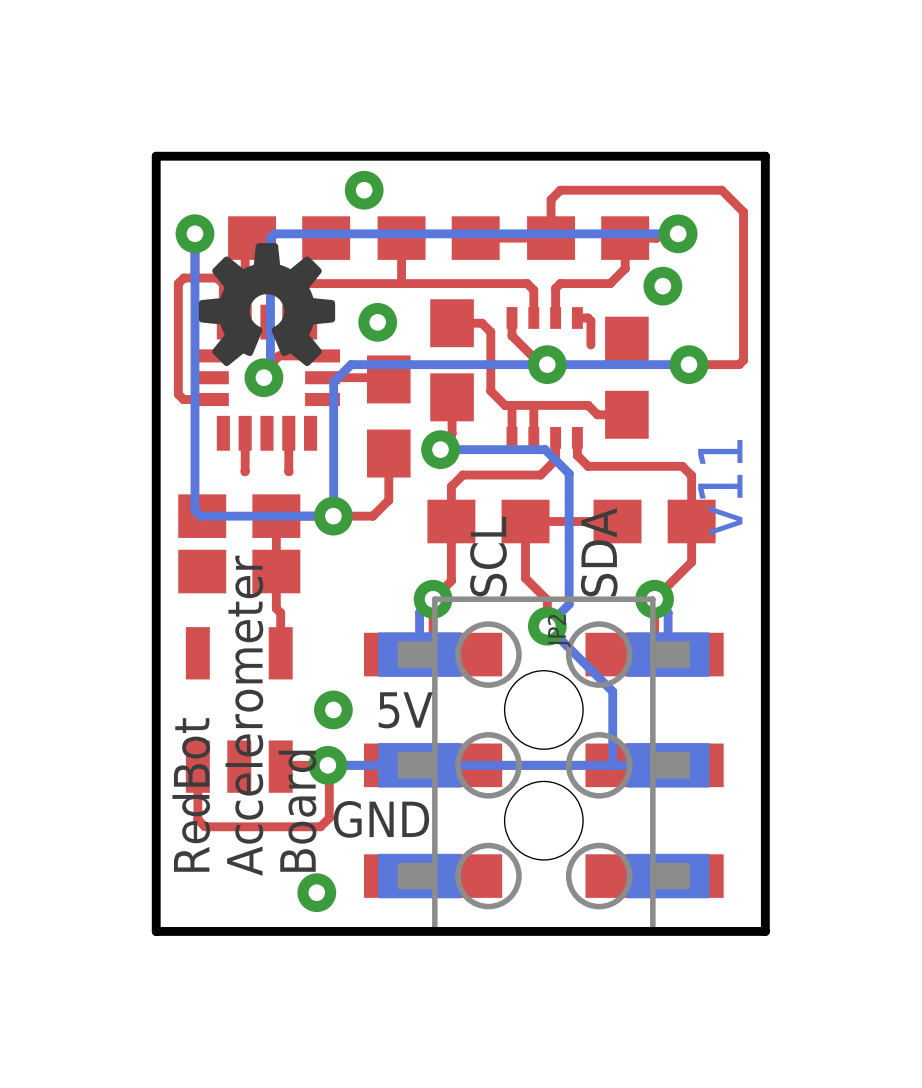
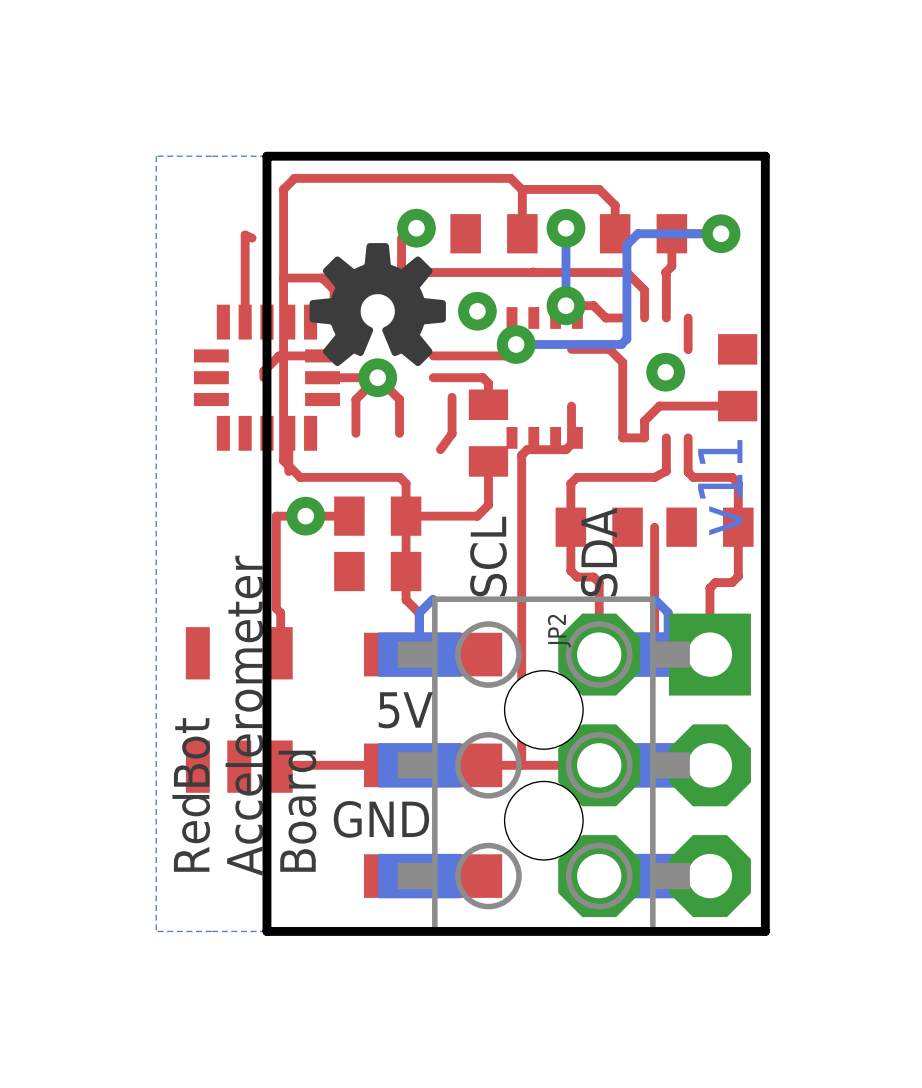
board edge: (266, 156) (156, 156) (156, 931) (266, 931) -> (266, 156) (266, 931)
top track: none -> (521, 189) (599, 189) (615, 205) (615, 233)
via: (364, 190) -> none
via: none -> (416, 228)
bottom track: none -> (565, 228) (565, 305)
via: none -> (565, 228)
bottom track: (194, 233) (194, 510) (200, 516) (333, 516) -> none
via: (194, 233) -> none
part: none -> (494, 233)
top track: none -> (522, 233) (522, 190) (510, 178) (294, 178) (283, 189) (283, 460) (300, 477) (399, 477) (406, 483) (406, 599) (419, 612) (419, 653)
bottom track: (637, 233) (274, 233) (270, 238) (270, 371) (263, 377) -> (637, 233) (626, 244) (626, 338) (621, 344) (516, 344)
part: none -> (643, 233)
top track: (671, 233) (660, 233) (656, 238) (625, 238) (625, 268) (610, 283) (560, 283) (555, 288) (555, 317) -> (671, 233) (671, 266) (665, 272) (666, 317)
via: (678, 233) -> none
via: none -> (721, 233)
part: (289, 238) -> none
part: (438, 238) -> none
top track: (475, 238) (551, 238) (551, 199) (560, 190) (721, 190) (743, 212) (743, 360) (739, 364) (689, 364) -> none
part: (588, 238) -> none
top track: none -> (283, 278) (322, 278) (334, 289) (334, 322)
via: (662, 286) -> none
drawing position: (266, 304) -> (377, 304)
top track: none -> (565, 305) (593, 305) (605, 317) (622, 317)
via: none -> (565, 305)
via: none -> (477, 311)
top track: (512, 317) (512, 335) (540, 364) (547, 364) -> none
top track: (533, 317) (533, 290) (527, 283) (297, 283) (288, 291) (288, 322) -> none
top track: (577, 317) (587, 317) (590, 321) (590, 345) -> none
top track: none -> (644, 317) (644, 290) (626, 272) (405, 272) (399, 278) (399, 322)
top track: none -> (688, 317) (688, 349)
top track: (223, 322) (223, 284) (217, 278) (183, 278) (178, 283) (178, 394) (183, 399) (211, 399) -> none
via: (377, 322) -> none
top track: (452, 323) (481, 323) (490, 332) (490, 391) (505, 405) (588, 405) (597, 414) (626, 414) -> none
top track: none -> (516, 344) (504, 355) (433, 355)
top track: none -> (571, 349) (609, 349) (622, 362) (622, 437) (644, 437) (644, 420) (659, 406) (737, 406)
part: (452, 360) -> none
via position: (547, 364) -> (516, 344)
bottom track: (689, 364) (351, 364) (333, 382) (333, 515) -> none
via position: (689, 364) -> (665, 372)
via: (263, 377) -> none
via: none -> (377, 377)
top track: none -> (433, 377) (482, 377) (488, 383) (488, 404)
part: (626, 377) -> none
part: none -> (737, 377)
top track: (510, 405) (512, 437) -> none
top track: (532, 405) (533, 437) -> none
top track: none -> (571, 406) (571, 444) (565, 449) (527, 449) (521, 455) (521, 765)
part: (388, 416) -> none
top track: (245, 433) (245, 471) -> none
top track: none -> (399, 433) (399, 399) (377, 377) (355, 399) (355, 433)
part: none -> (488, 433)
top track: (555, 437) (555, 460) (540, 475) (462, 475) (451, 486) (451, 580) (433, 599) (433, 654) -> none
top track: (577, 437) (577, 455) (588, 466) (682, 466) (688, 472) -> (688, 437) (688, 472)
top track: none -> (666, 437) (666, 471) (654, 477) (577, 477) (570, 483) (570, 570) (577, 577) (593, 577) (599, 582) (599, 654)
bottom track: (440, 449) (545, 449) (569, 473) (569, 604) (547, 626) (612, 691) (612, 765) -> none
via: (440, 449) -> none
top track: (388, 453) (388, 500) (372, 516) (349, 516) -> none
top track: none -> (488, 461) (488, 505) (477, 516) (406, 516)
top track: (691, 475) (691, 562) (654, 599) -> (654, 527) (654, 599)
top track: none -> (691, 475) (693, 477) (732, 477) (738, 483) (738, 576) (732, 582) (715, 582) (709, 588) (709, 654)
part: (239, 516) -> none
via position: (333, 516) -> (305, 516)
part: none -> (377, 516)
part: (488, 521) -> none
top track: (617, 521) (525, 521) (525, 578) (547, 600) (547, 626) -> none
part: (654, 521) -> none
part: none -> (599, 527)
part: none -> (709, 527)
part: (239, 571) -> none
part: none -> (377, 571)
via: (433, 599) -> none
via: (654, 599) -> none
via: (547, 626) -> none
via: (333, 709) -> none
top track: (327, 765) (329, 818) (320, 826) (205, 826) (197, 819) (197, 766) -> none
via: (327, 765) -> none
part: none -> (654, 765)
bottom track: (668, 765) (327, 765) -> none
via: (316, 892) -> none

